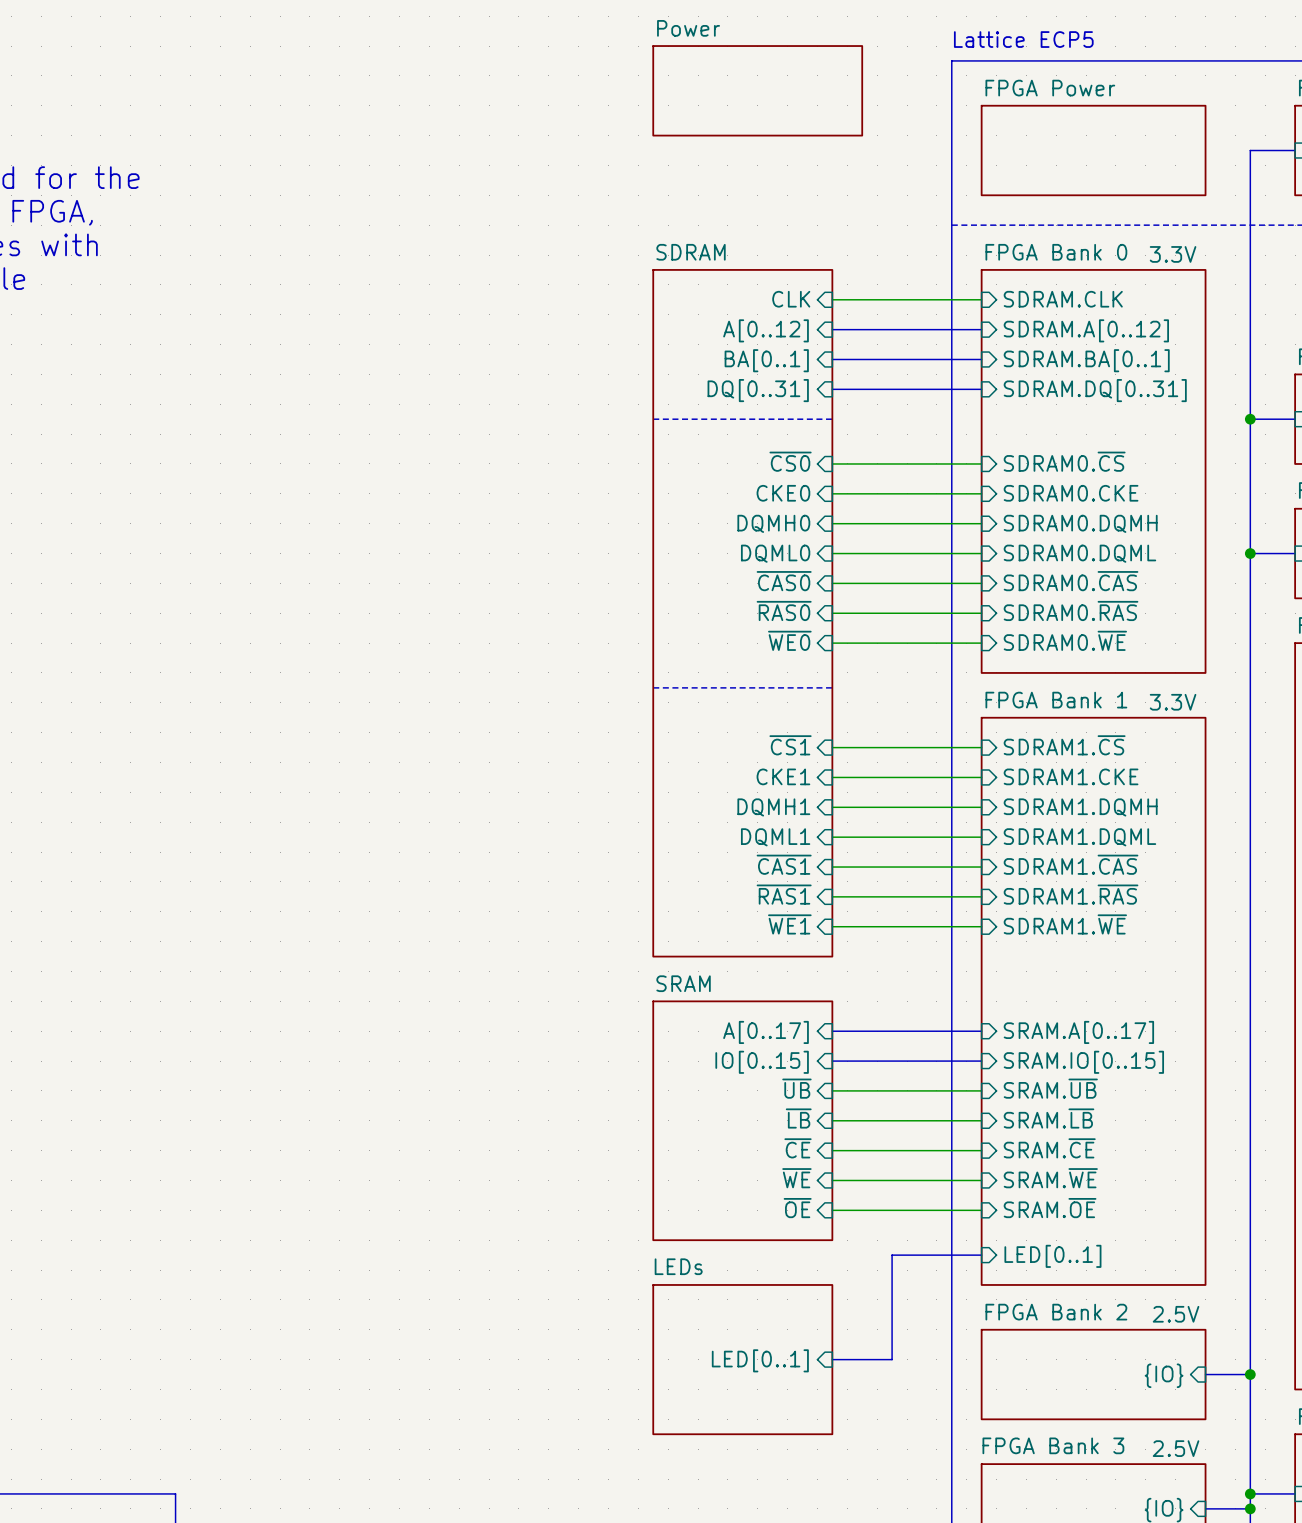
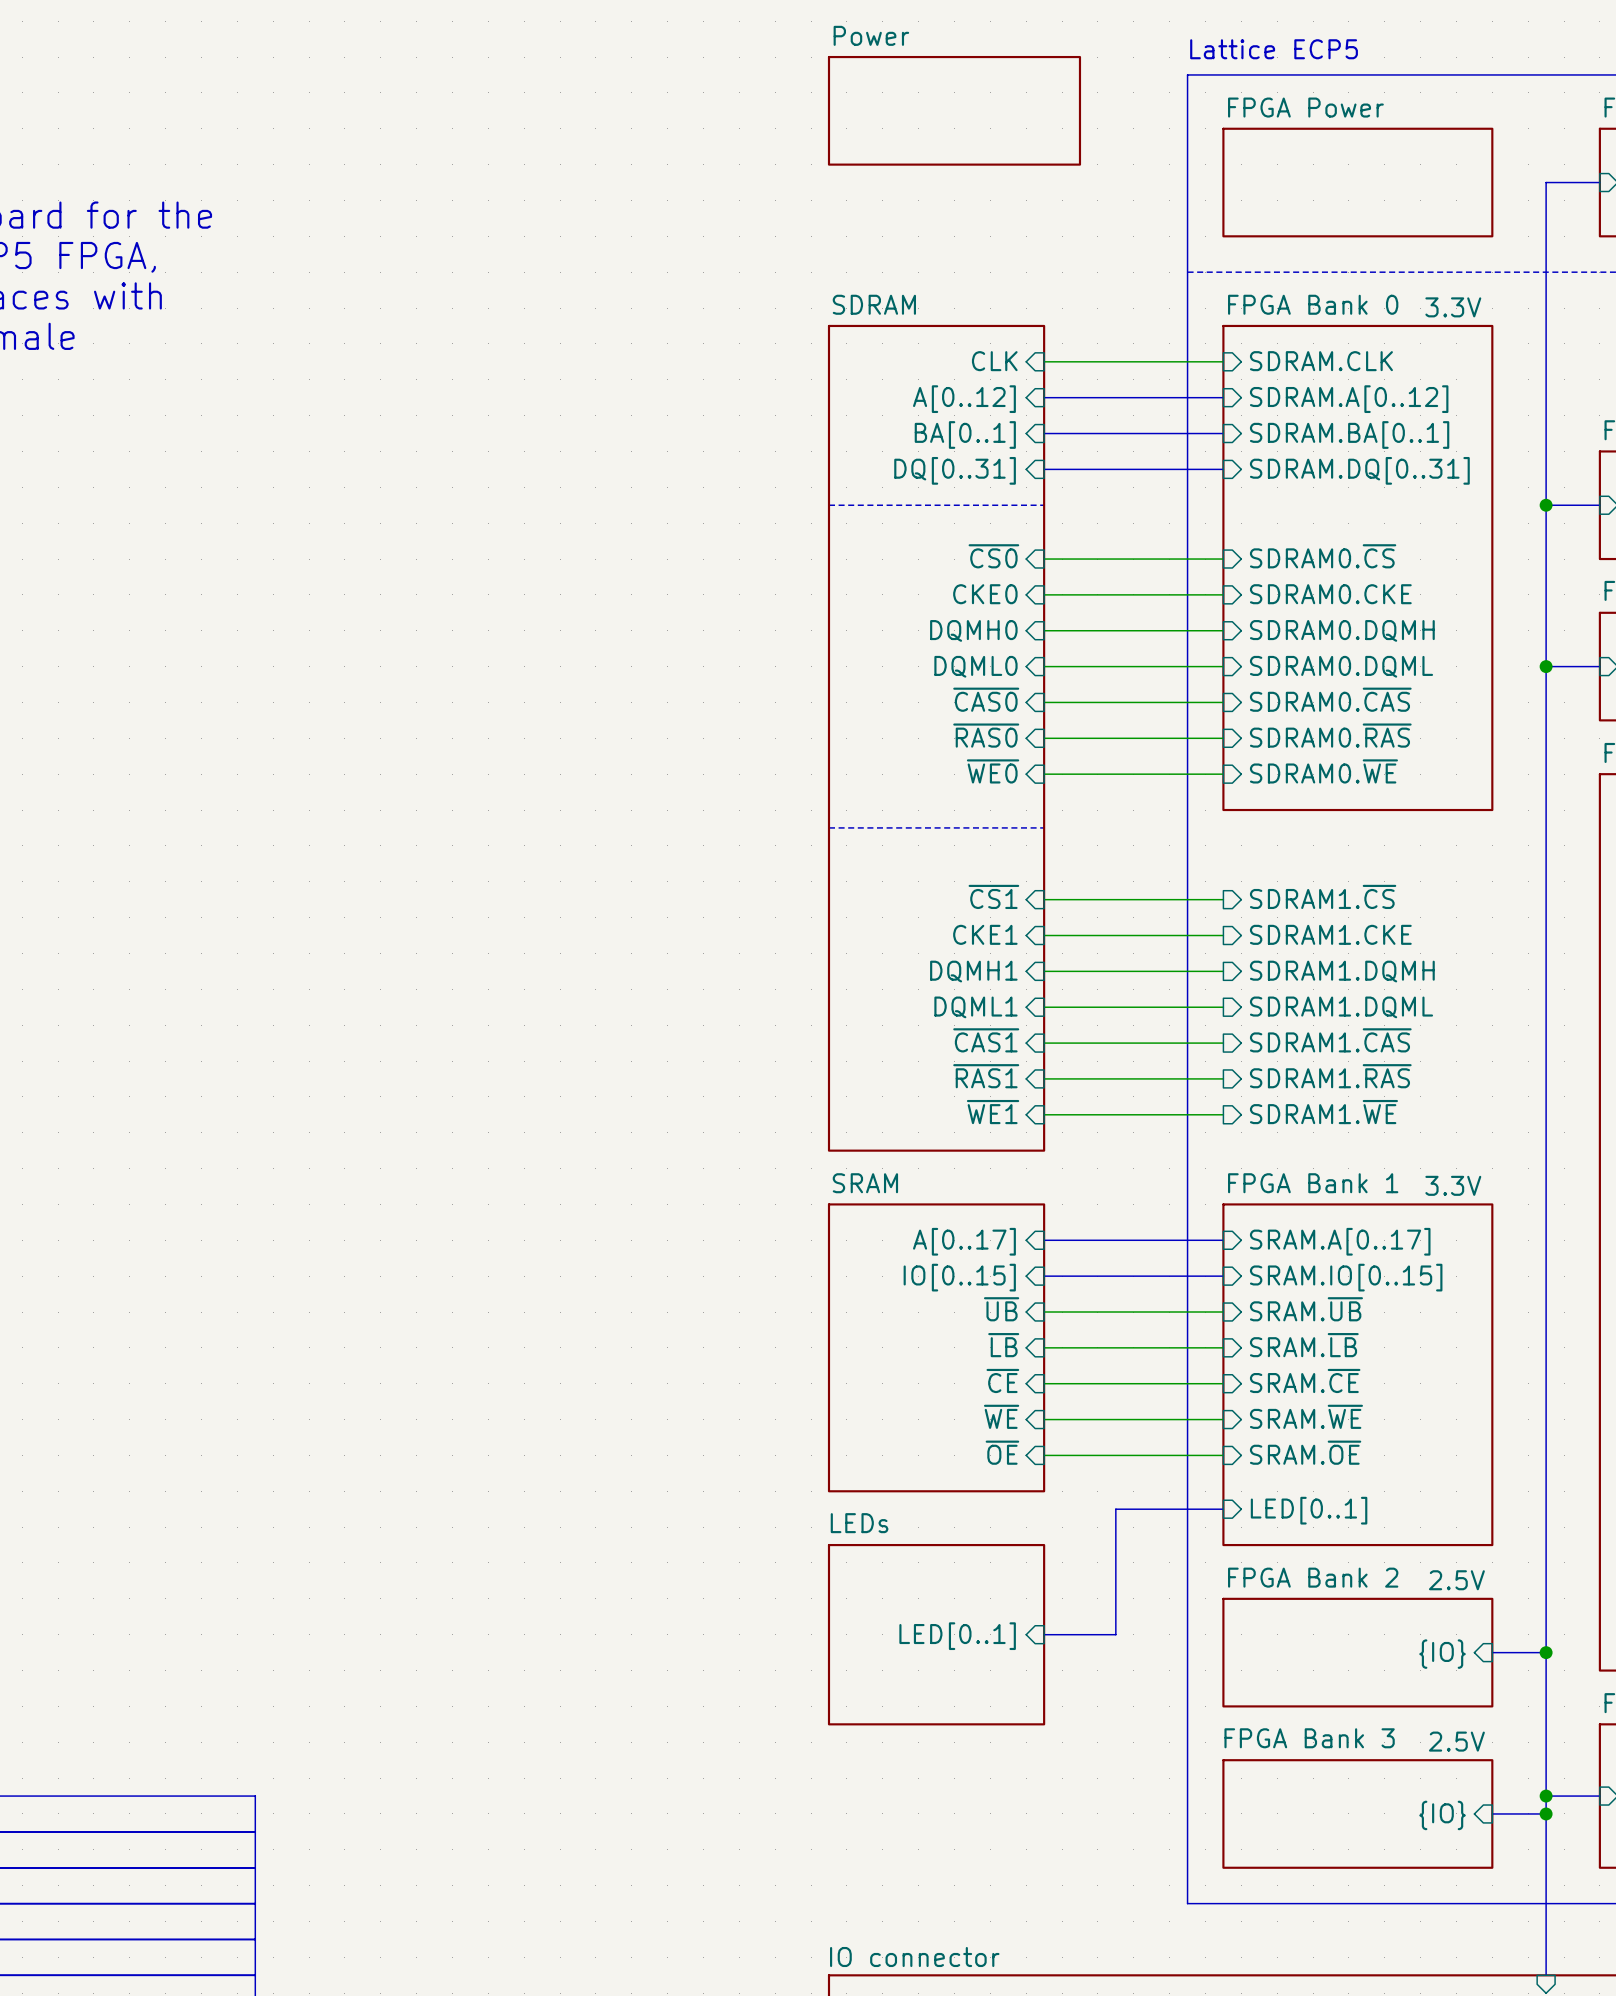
sheet FPGA Bank 1 name position: FPGA Bank 1 (1056, 700) -> FPGA Bank 1 (1313, 1183)
sheet FPGA Bank 1 text position: 3.3V (1173, 702) -> 3.3V (1453, 1185)
sheet FPGA Bank 1 shape: [980, 716, 1207, 1286] -> [1222, 1203, 1494, 1547]

